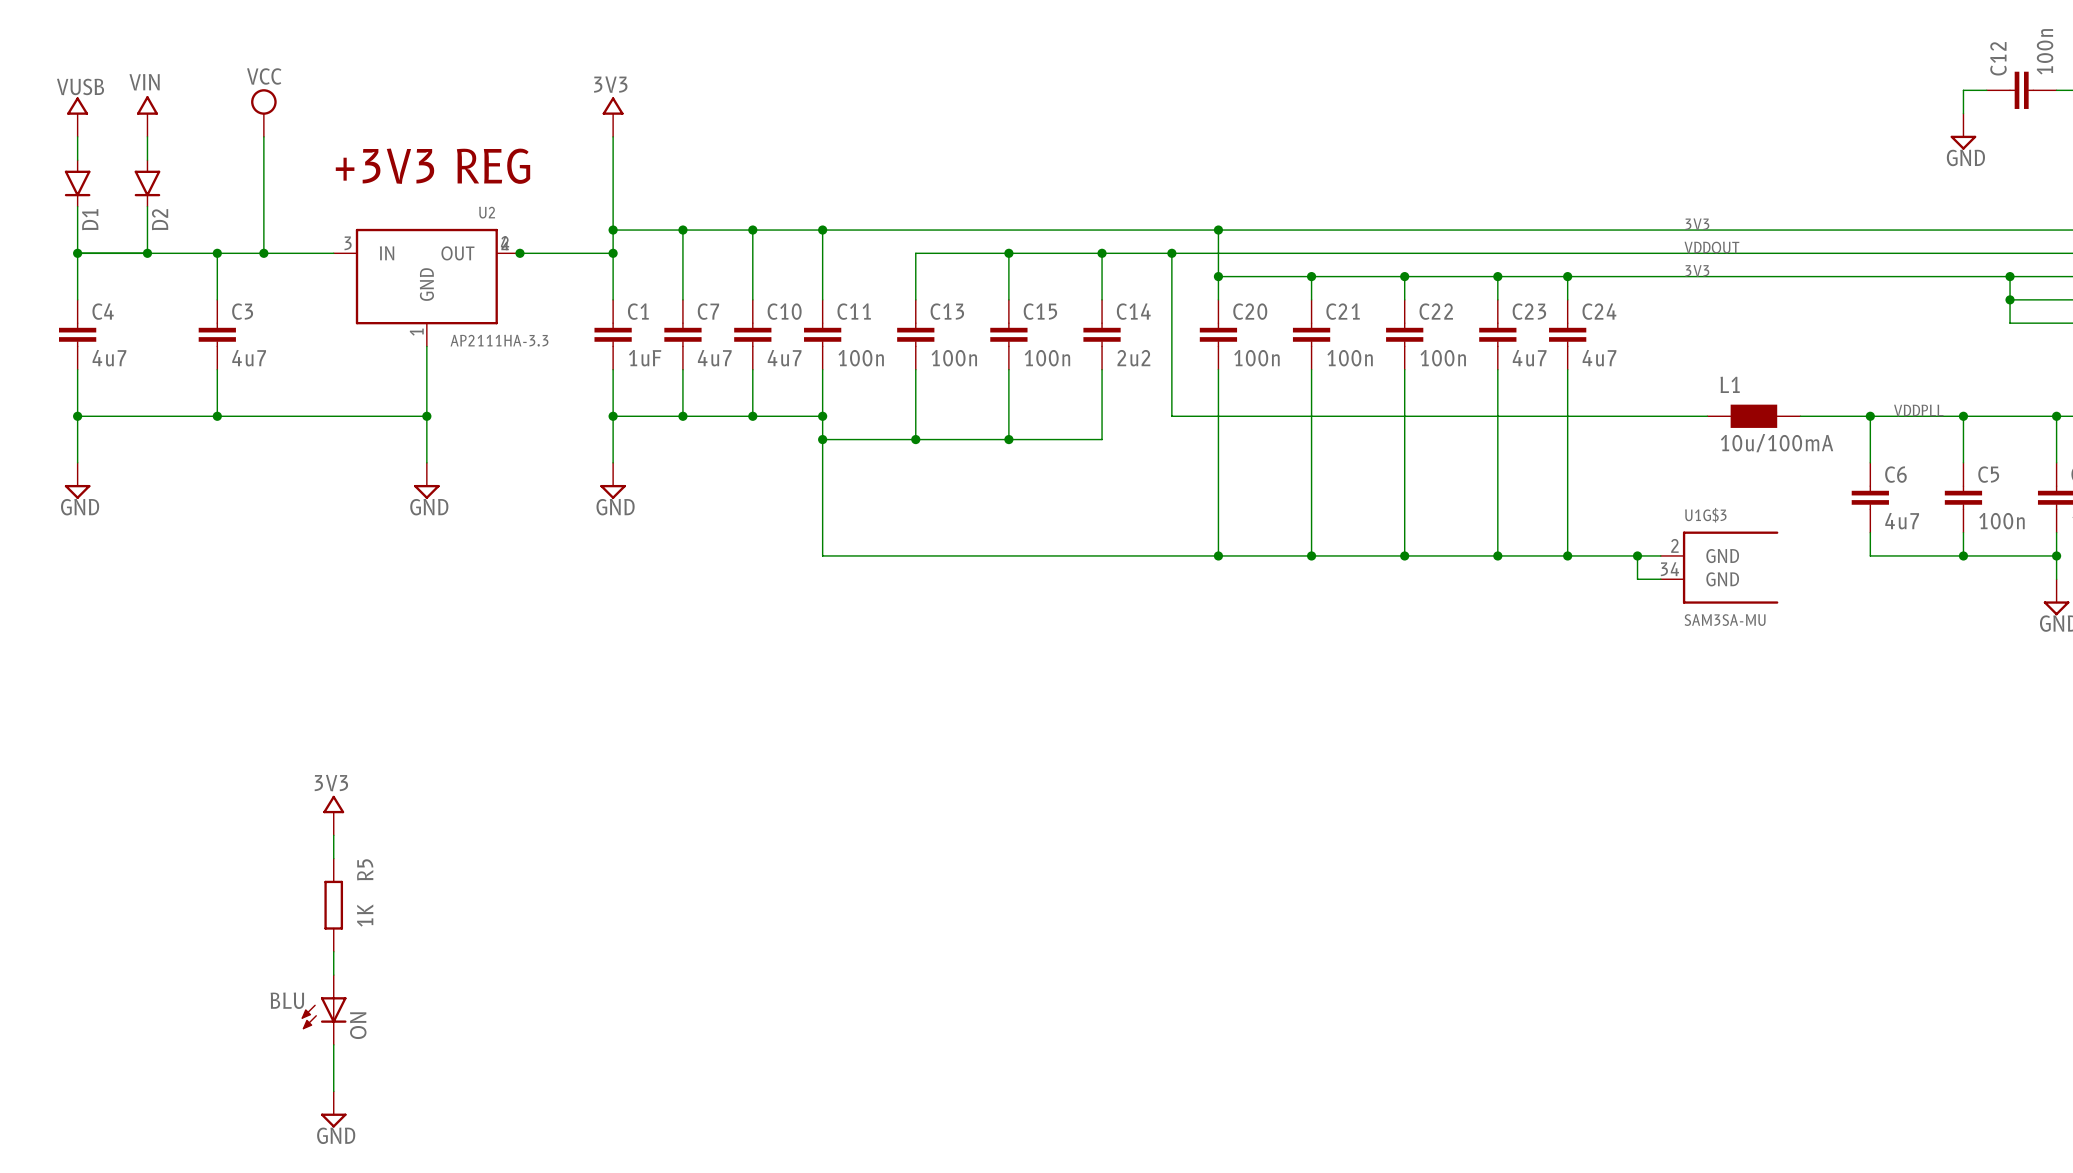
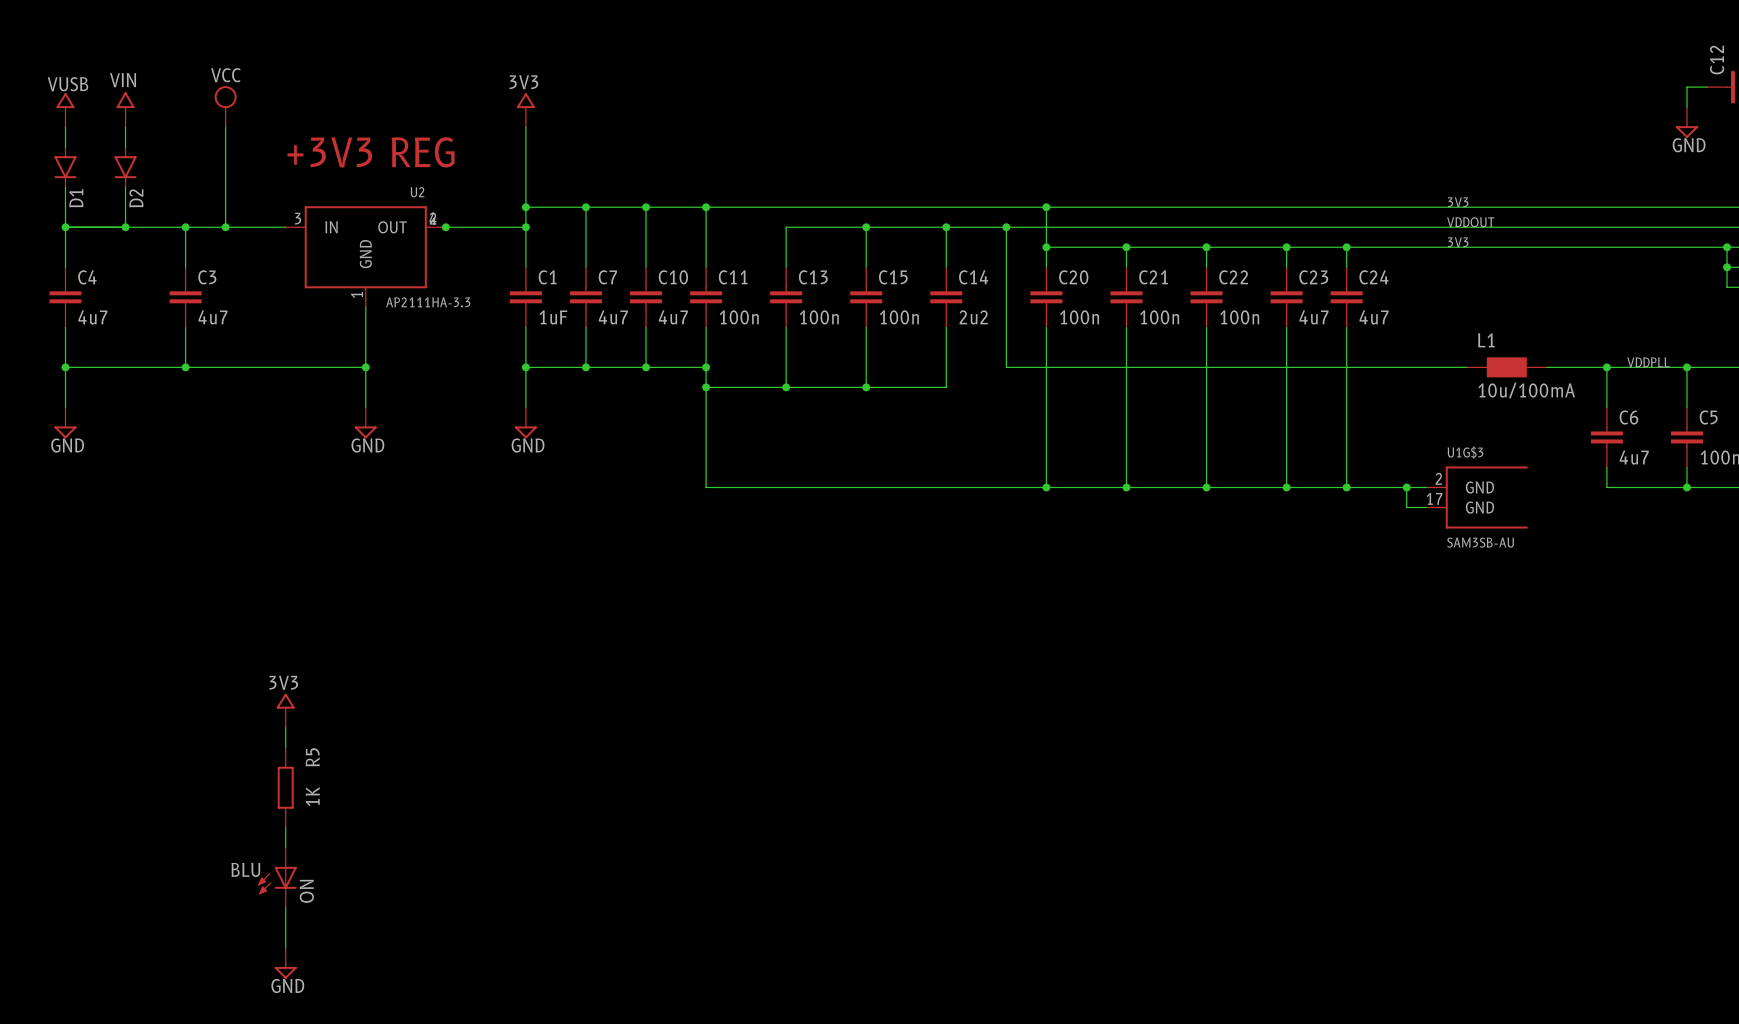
U1G$3 pin number: 34 (1669, 569) -> 17 (1434, 498)
U1G$3 value: SAM3SA-MU (1725, 620) -> SAM3SB-AU (1480, 542)

